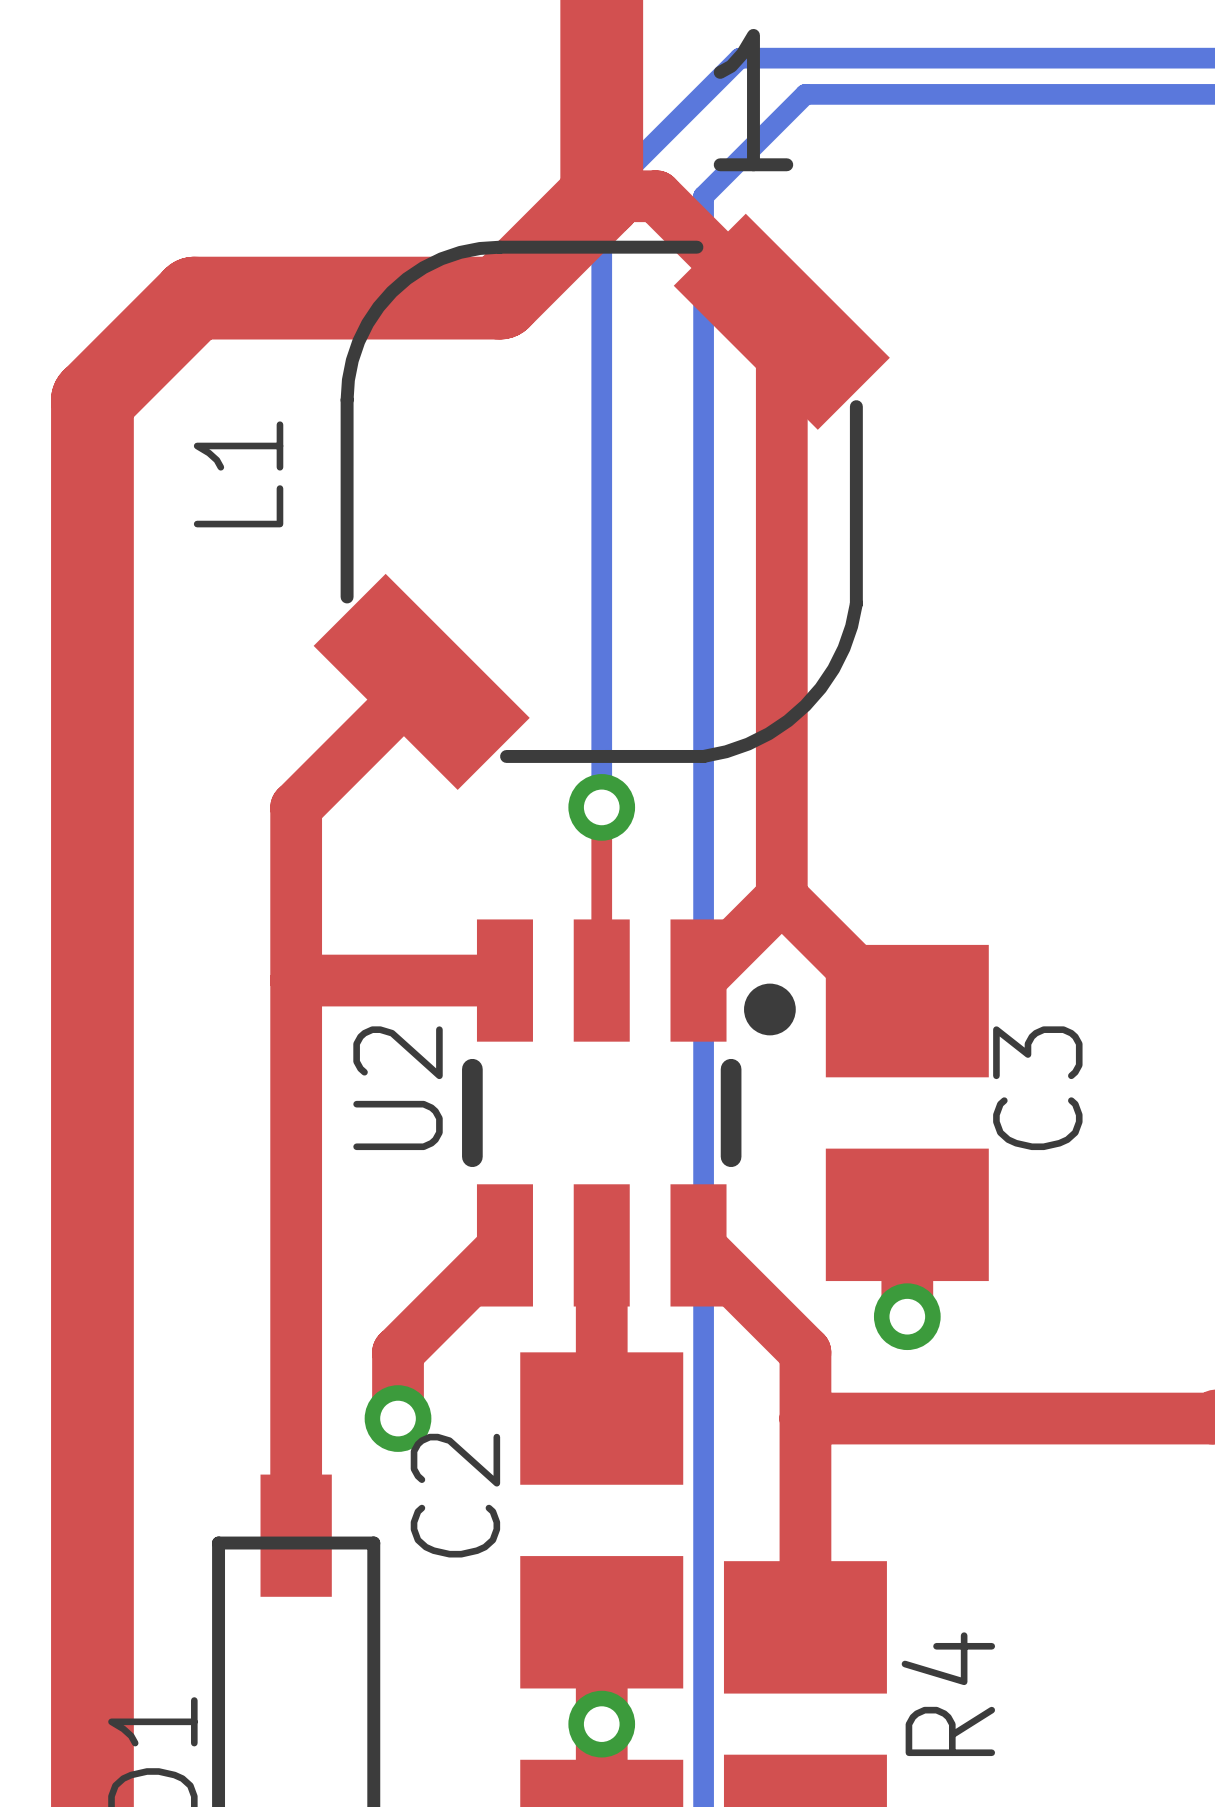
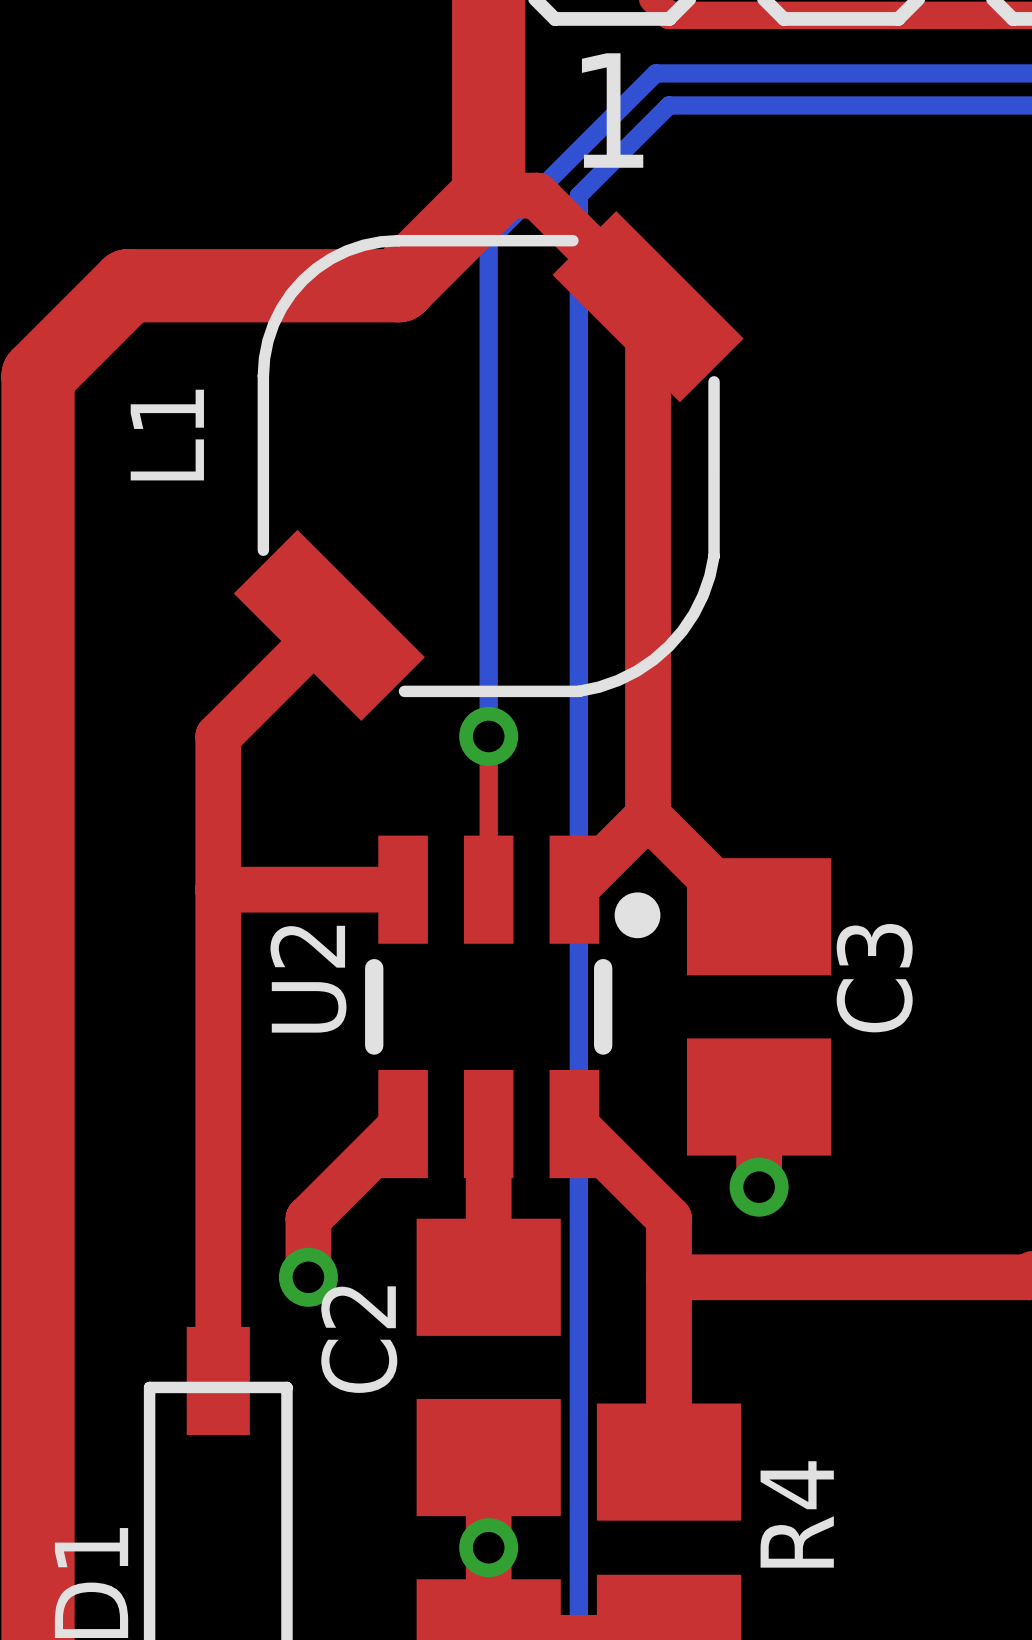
bottom track: (790, 58) (739, 58) (601, 196) (601, 246) -> (655, 73) (488, 240)

